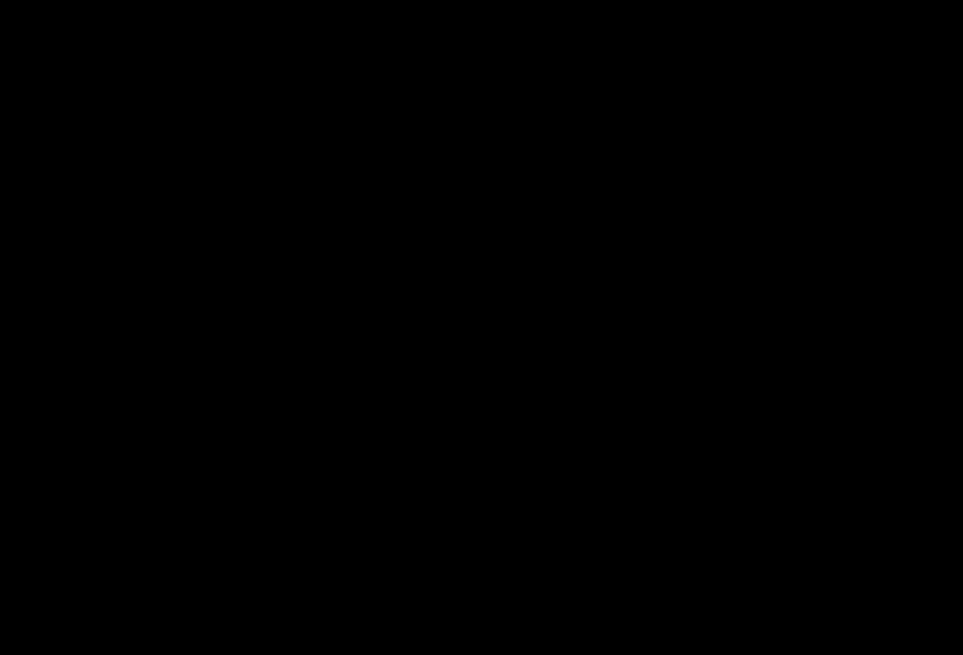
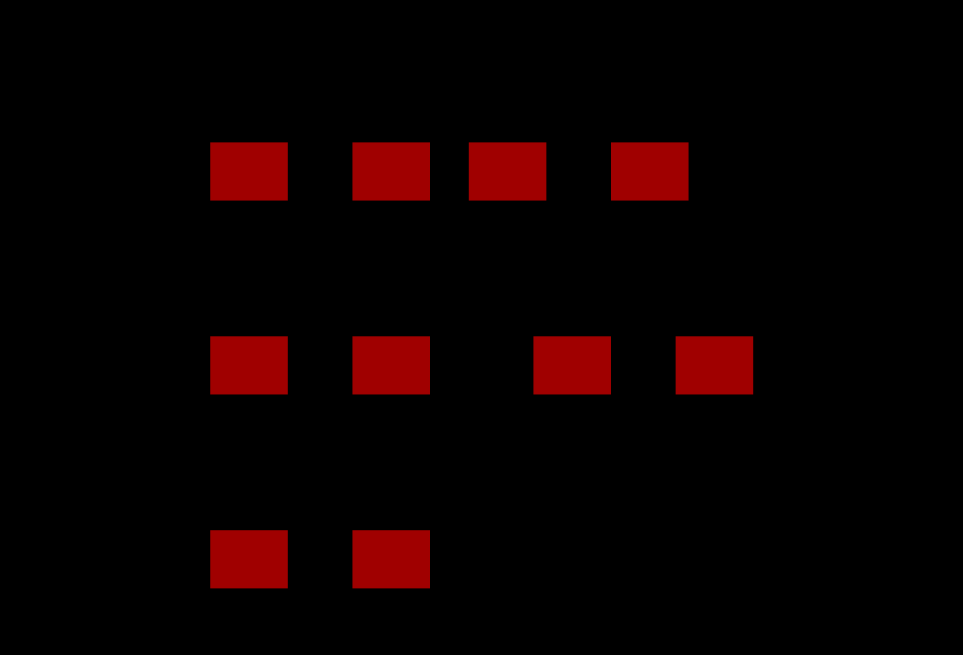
part: none -> (320, 171)
part: none -> (578, 171)
part: none -> (320, 365)
part: none -> (643, 365)
part: none -> (320, 559)

